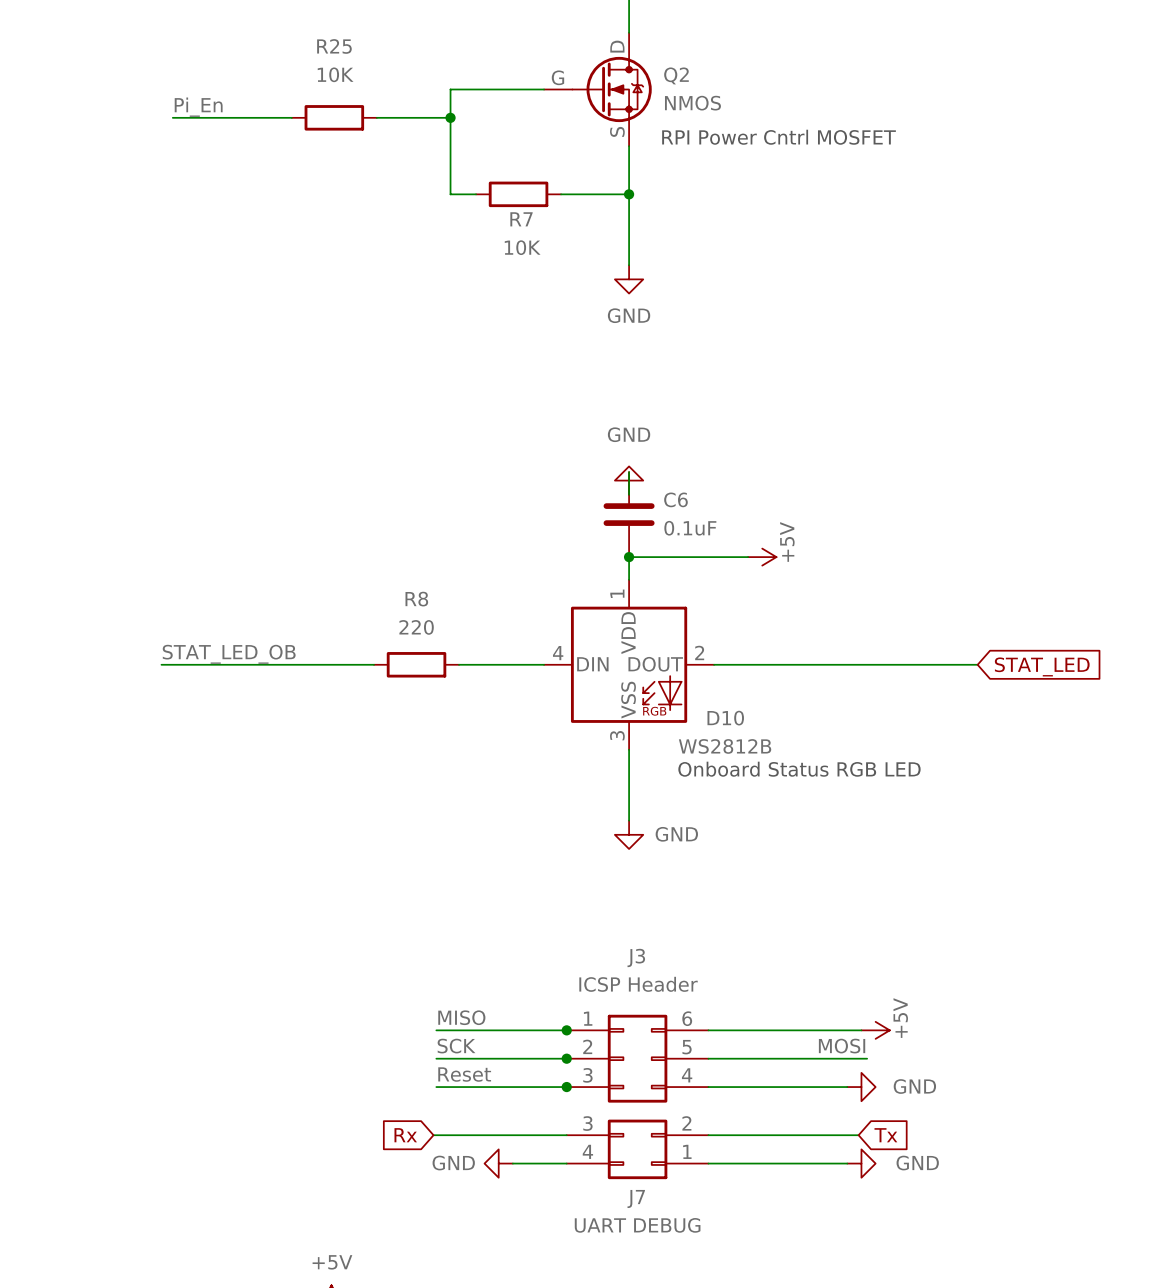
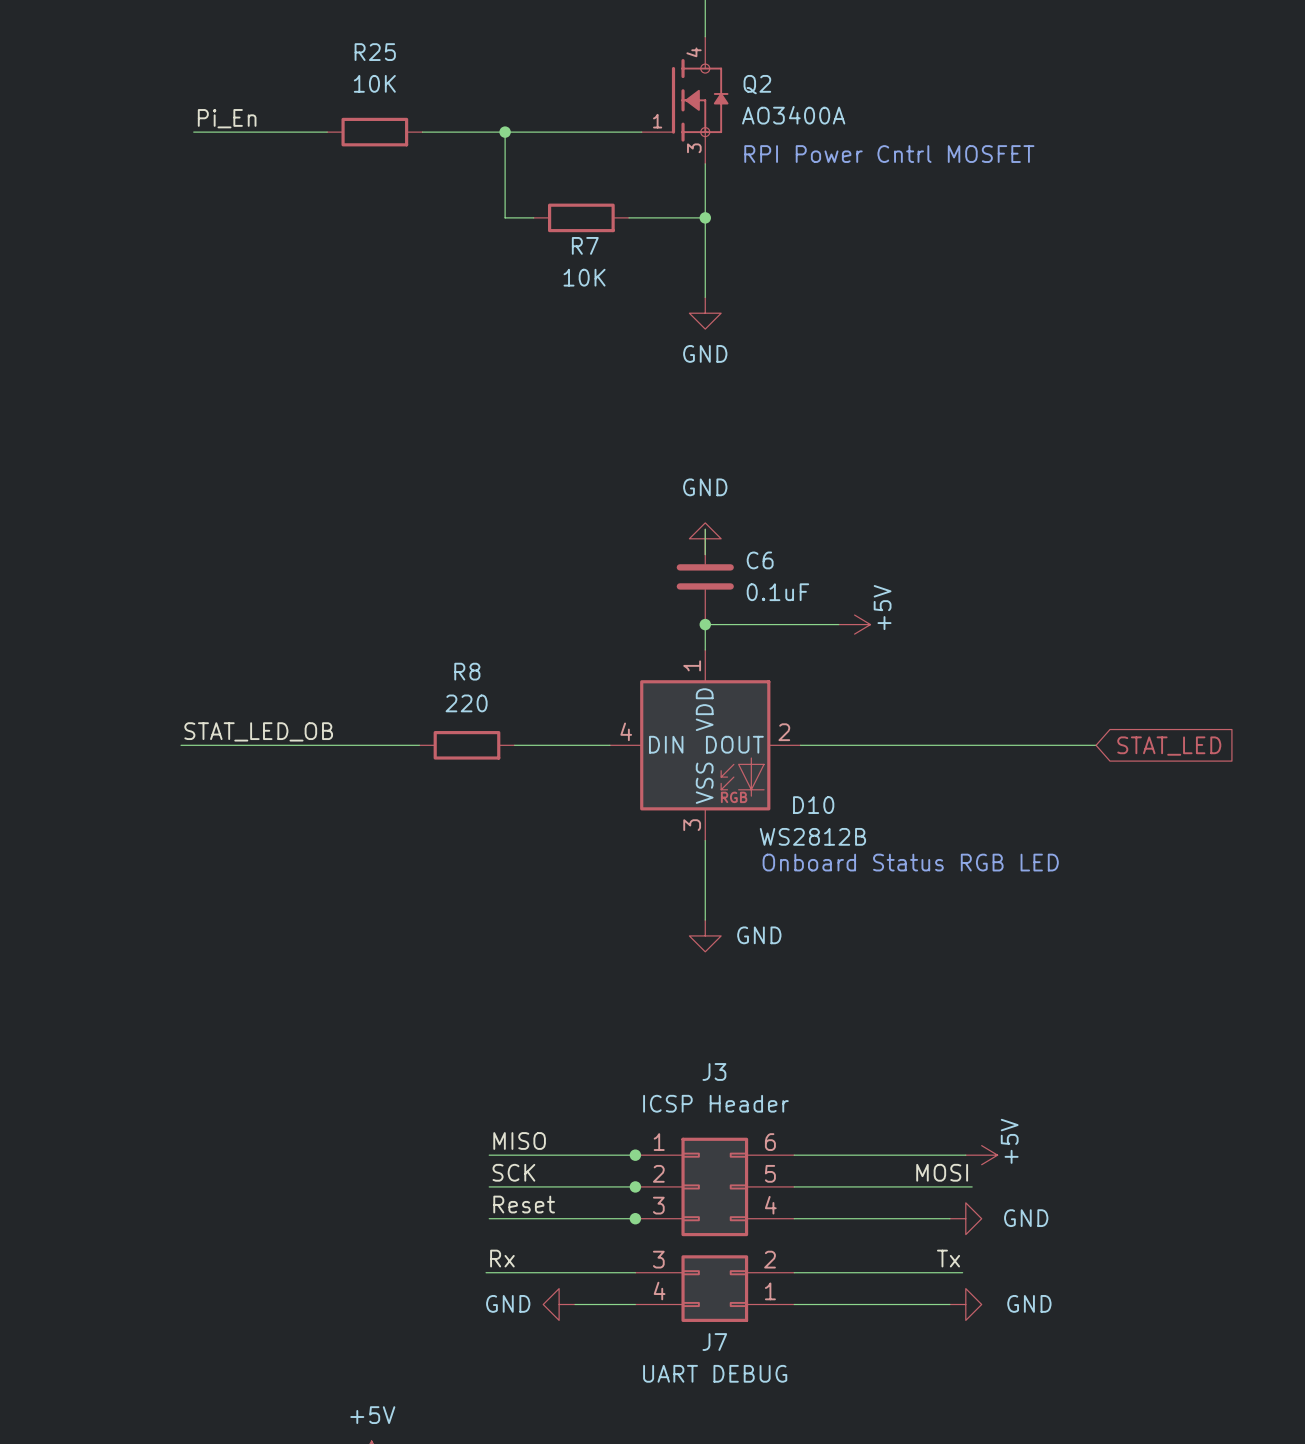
Q2 symbol: [544, 32, 652, 147] -> [641, 36, 729, 164]
wire: (544, 89) (450, 89) (450, 117) -> (641, 132) (505, 132)
Q2 value: NMOS (692, 103) -> AO3400A (793, 115)
label: none -> Rx (502, 1258)
label: none -> Tx (948, 1258)
global label: Rx (405, 1135) -> none
global label: Tx (885, 1135) -> none

